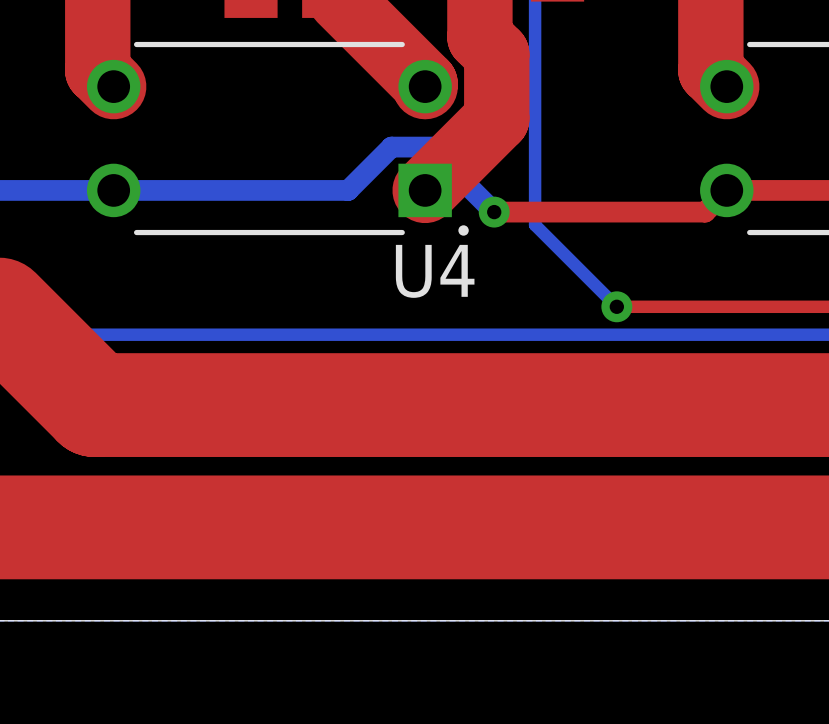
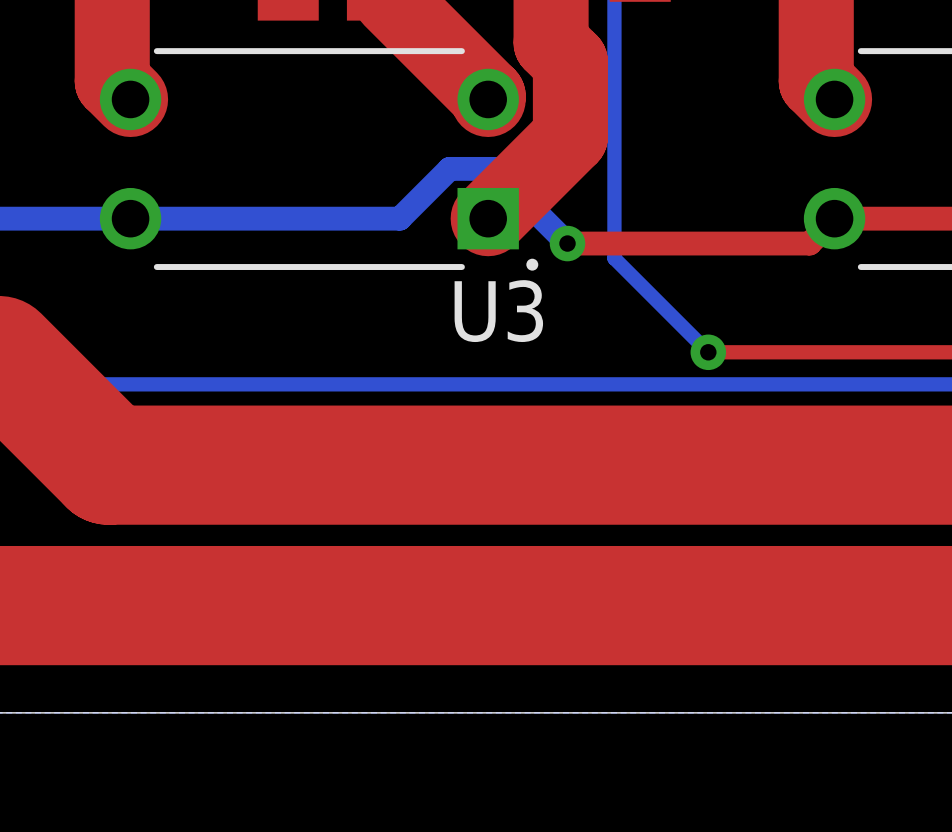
U4 name: U4 (435, 271) -> U3 (498, 311)

